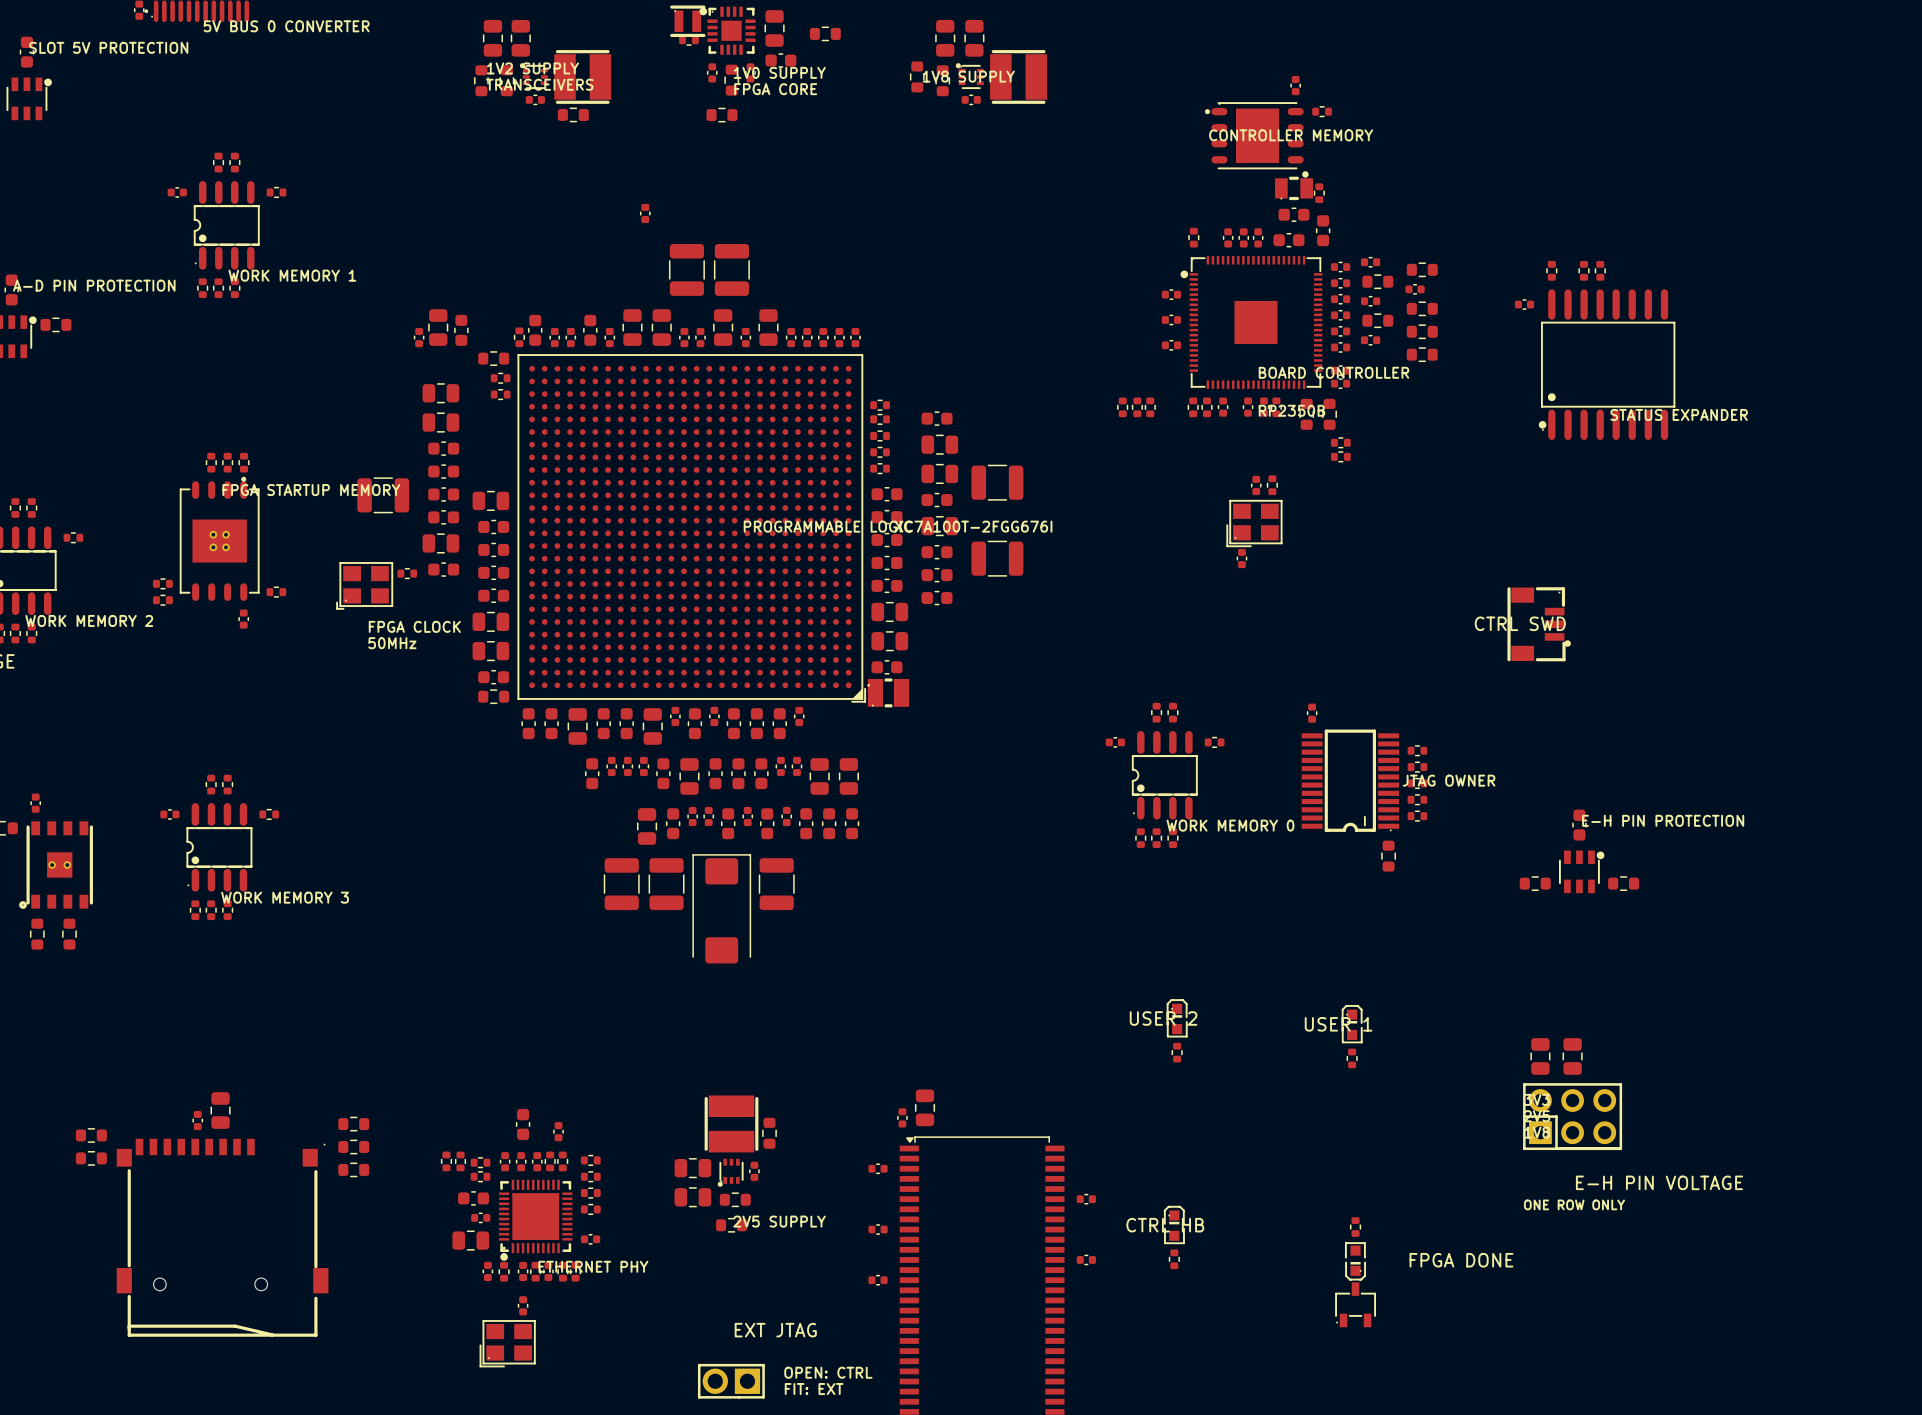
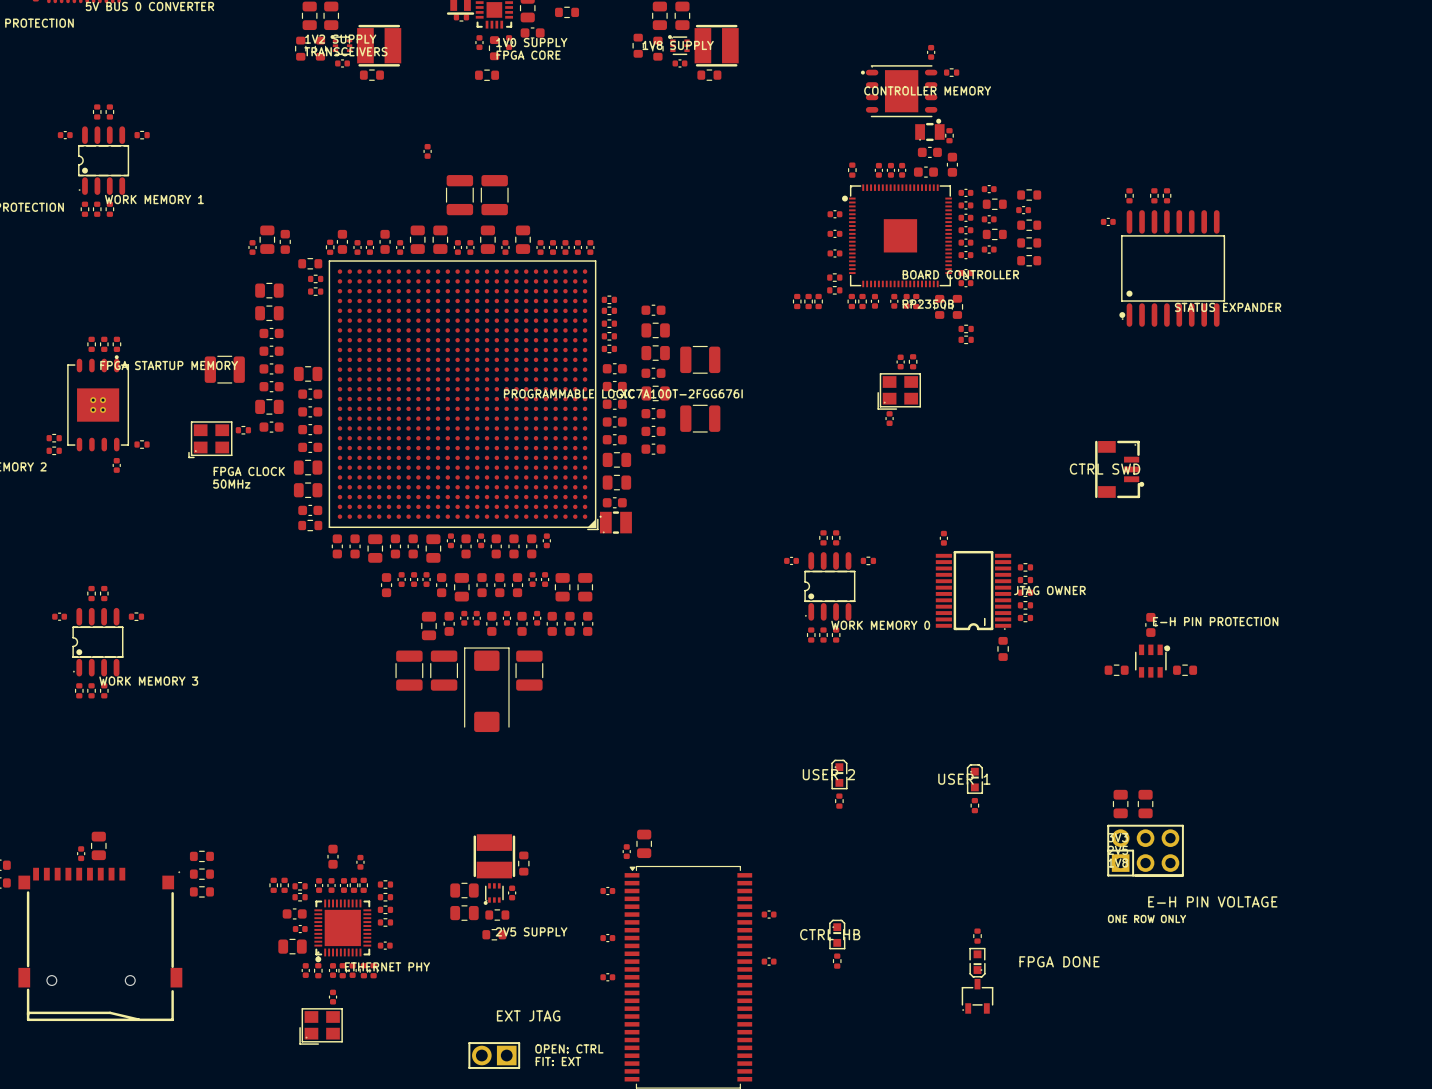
part: none -> (709, 75)
part: none -> (834, 277)
part: none -> (834, 290)

